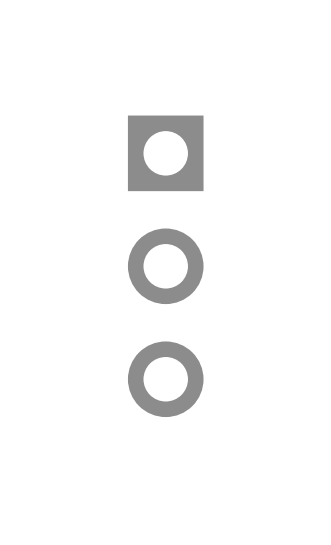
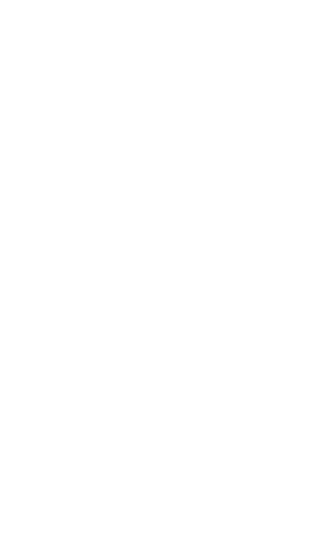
part: (165, 266) -> none

